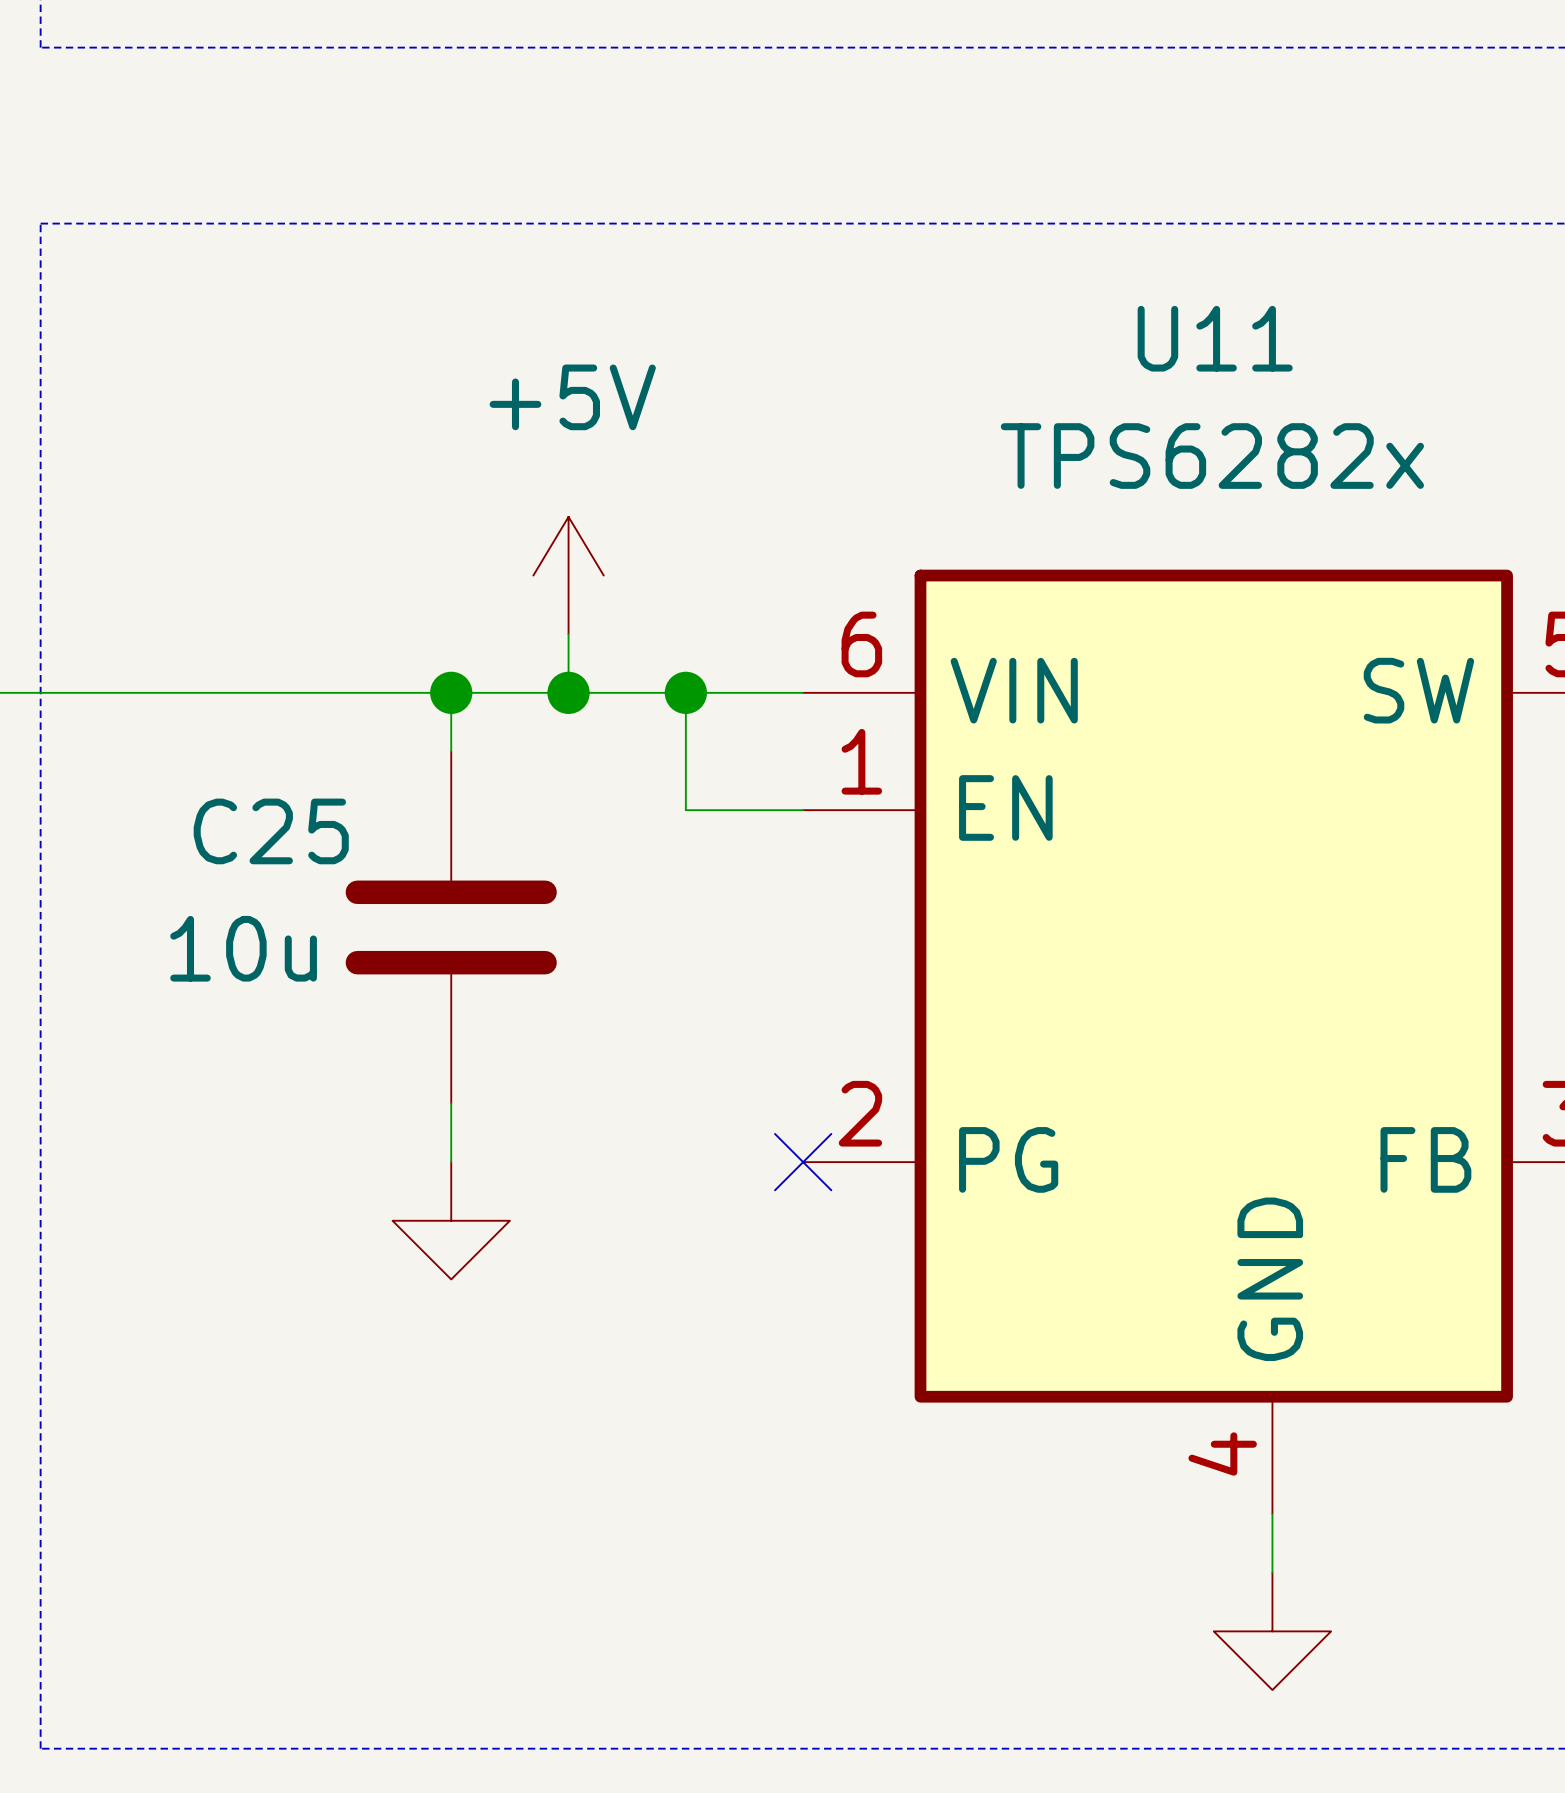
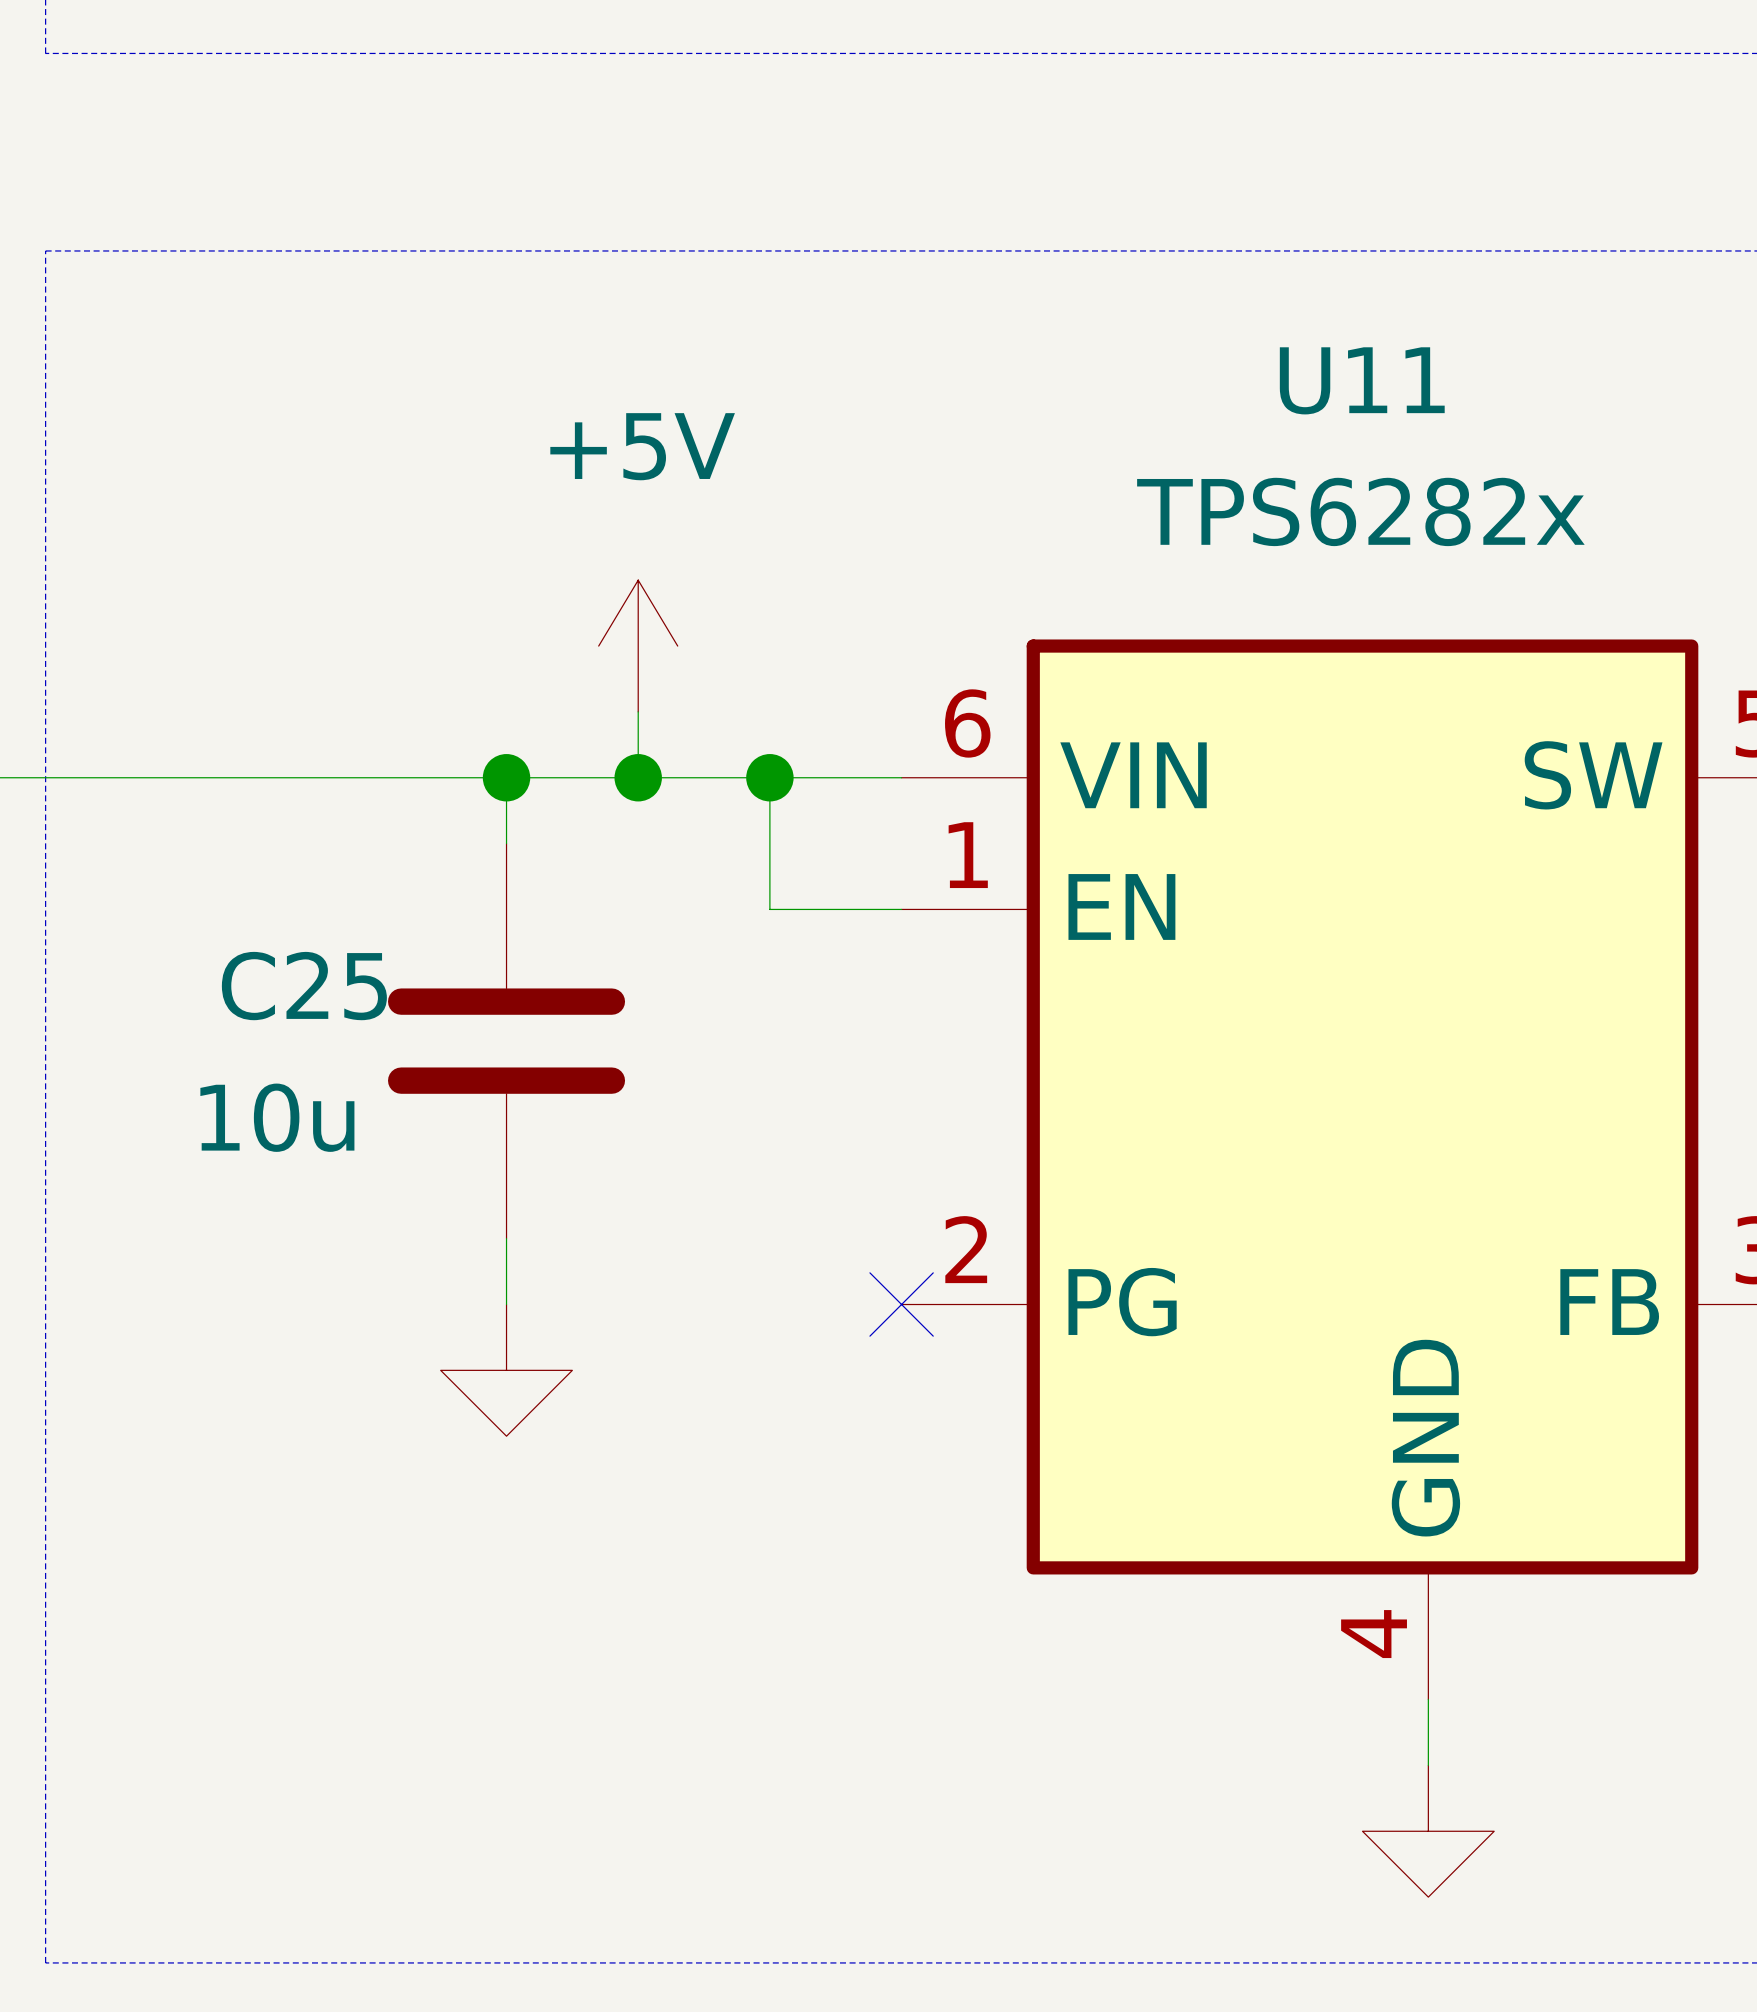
C25 name position: C25 (271, 831) -> C25 (304, 986)
C25 value position: 10u (243, 948) -> 10u (277, 1117)

